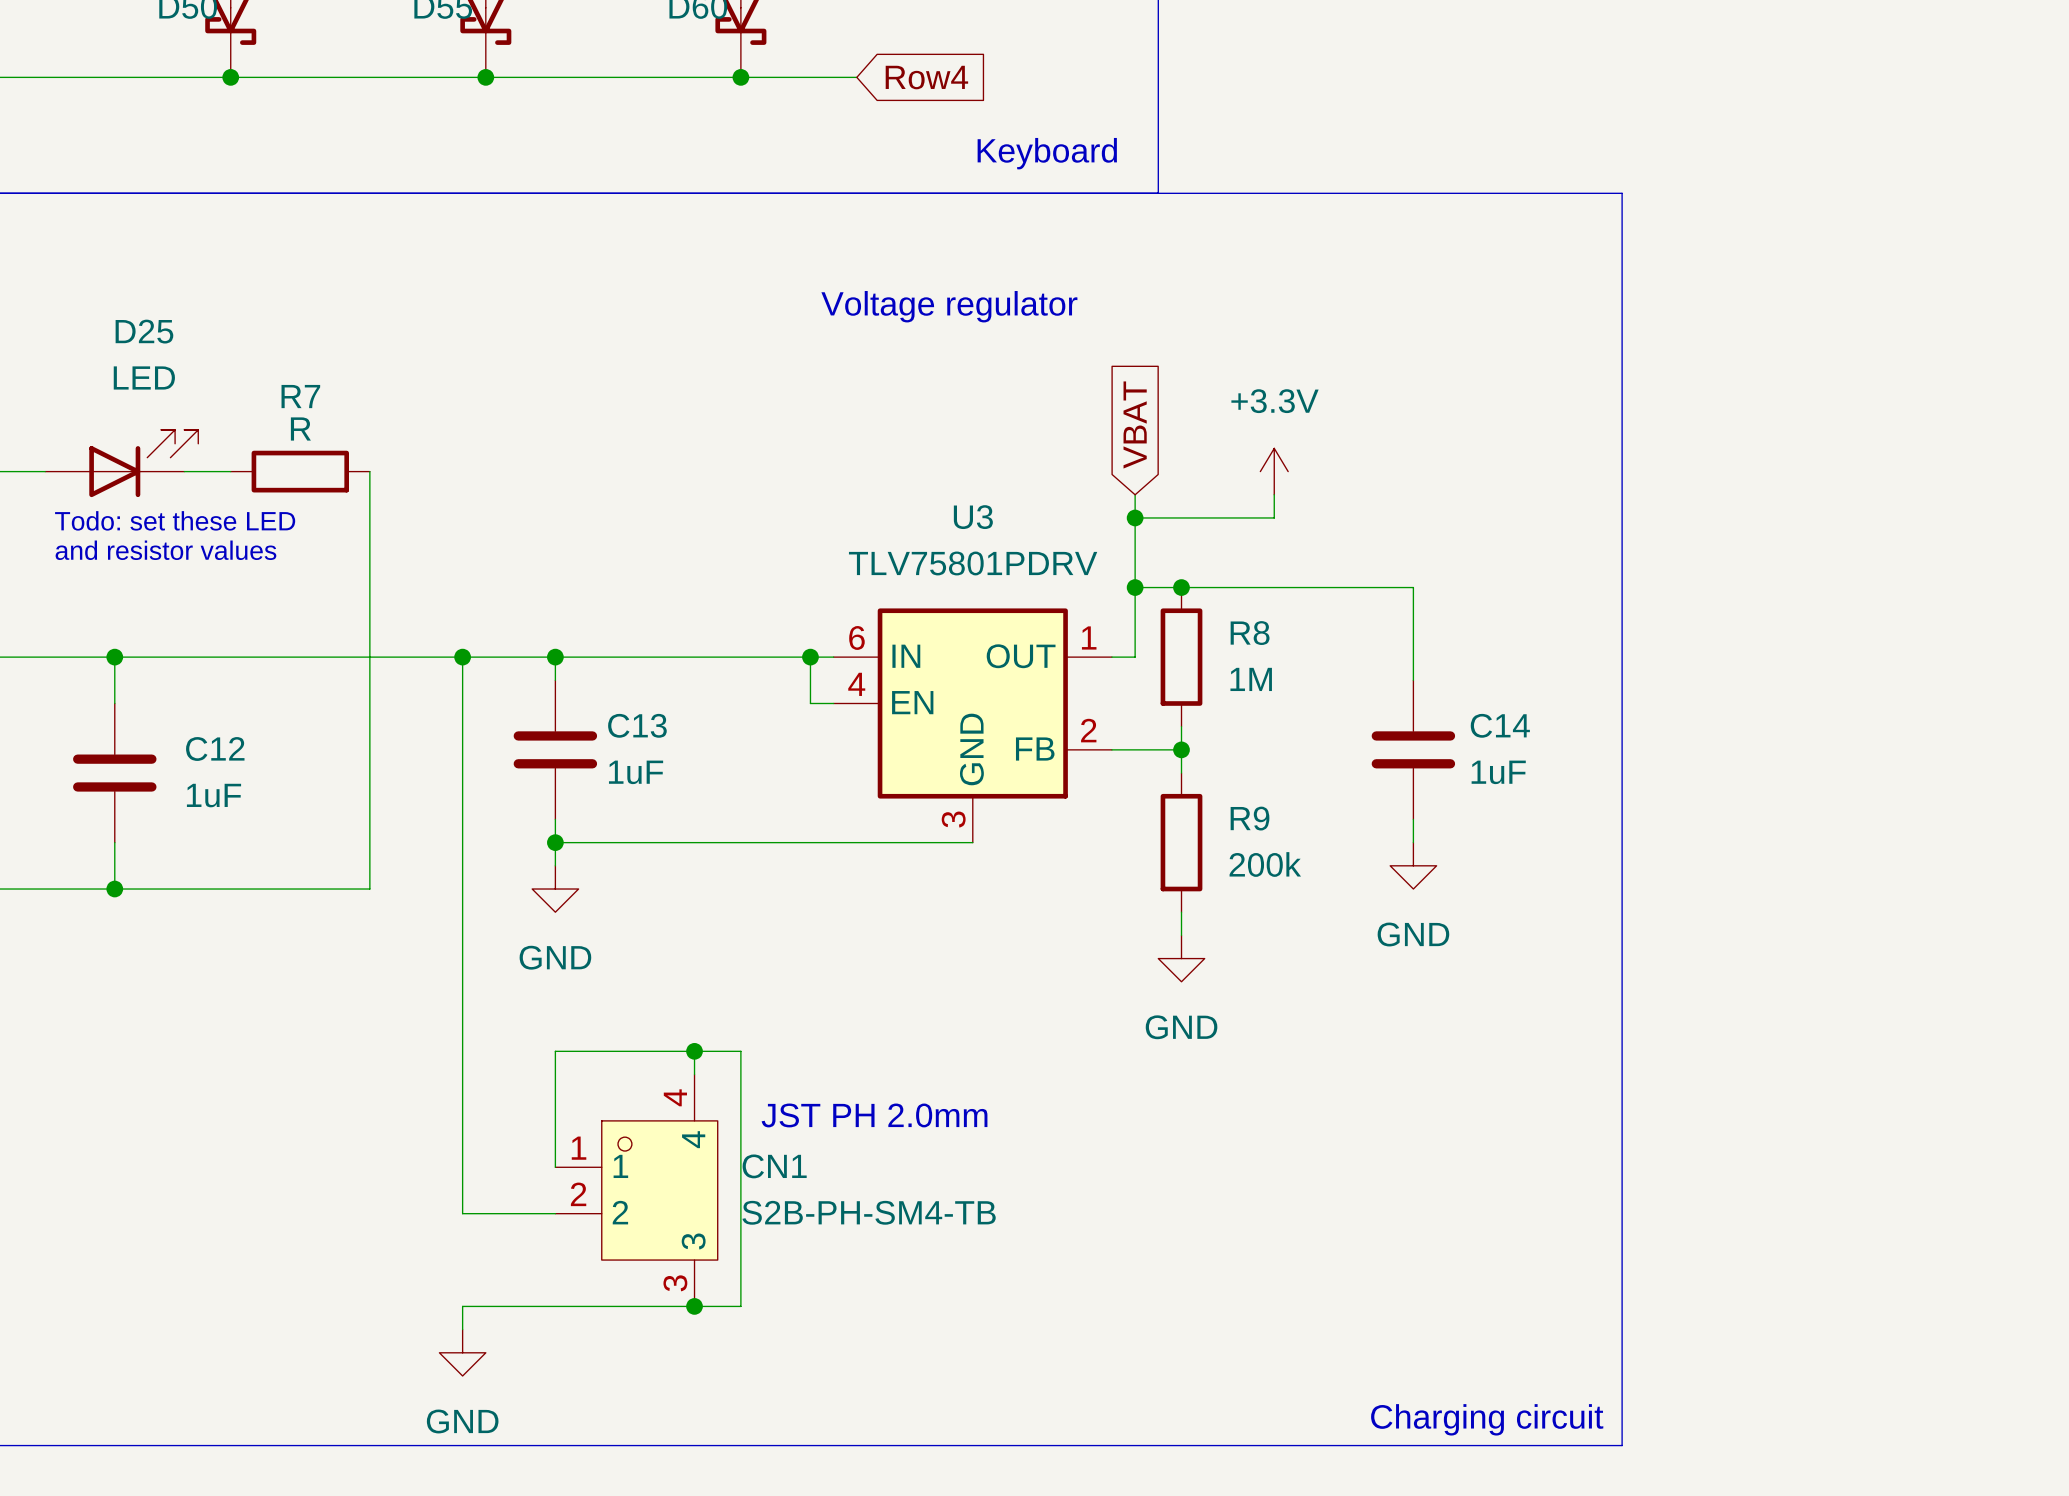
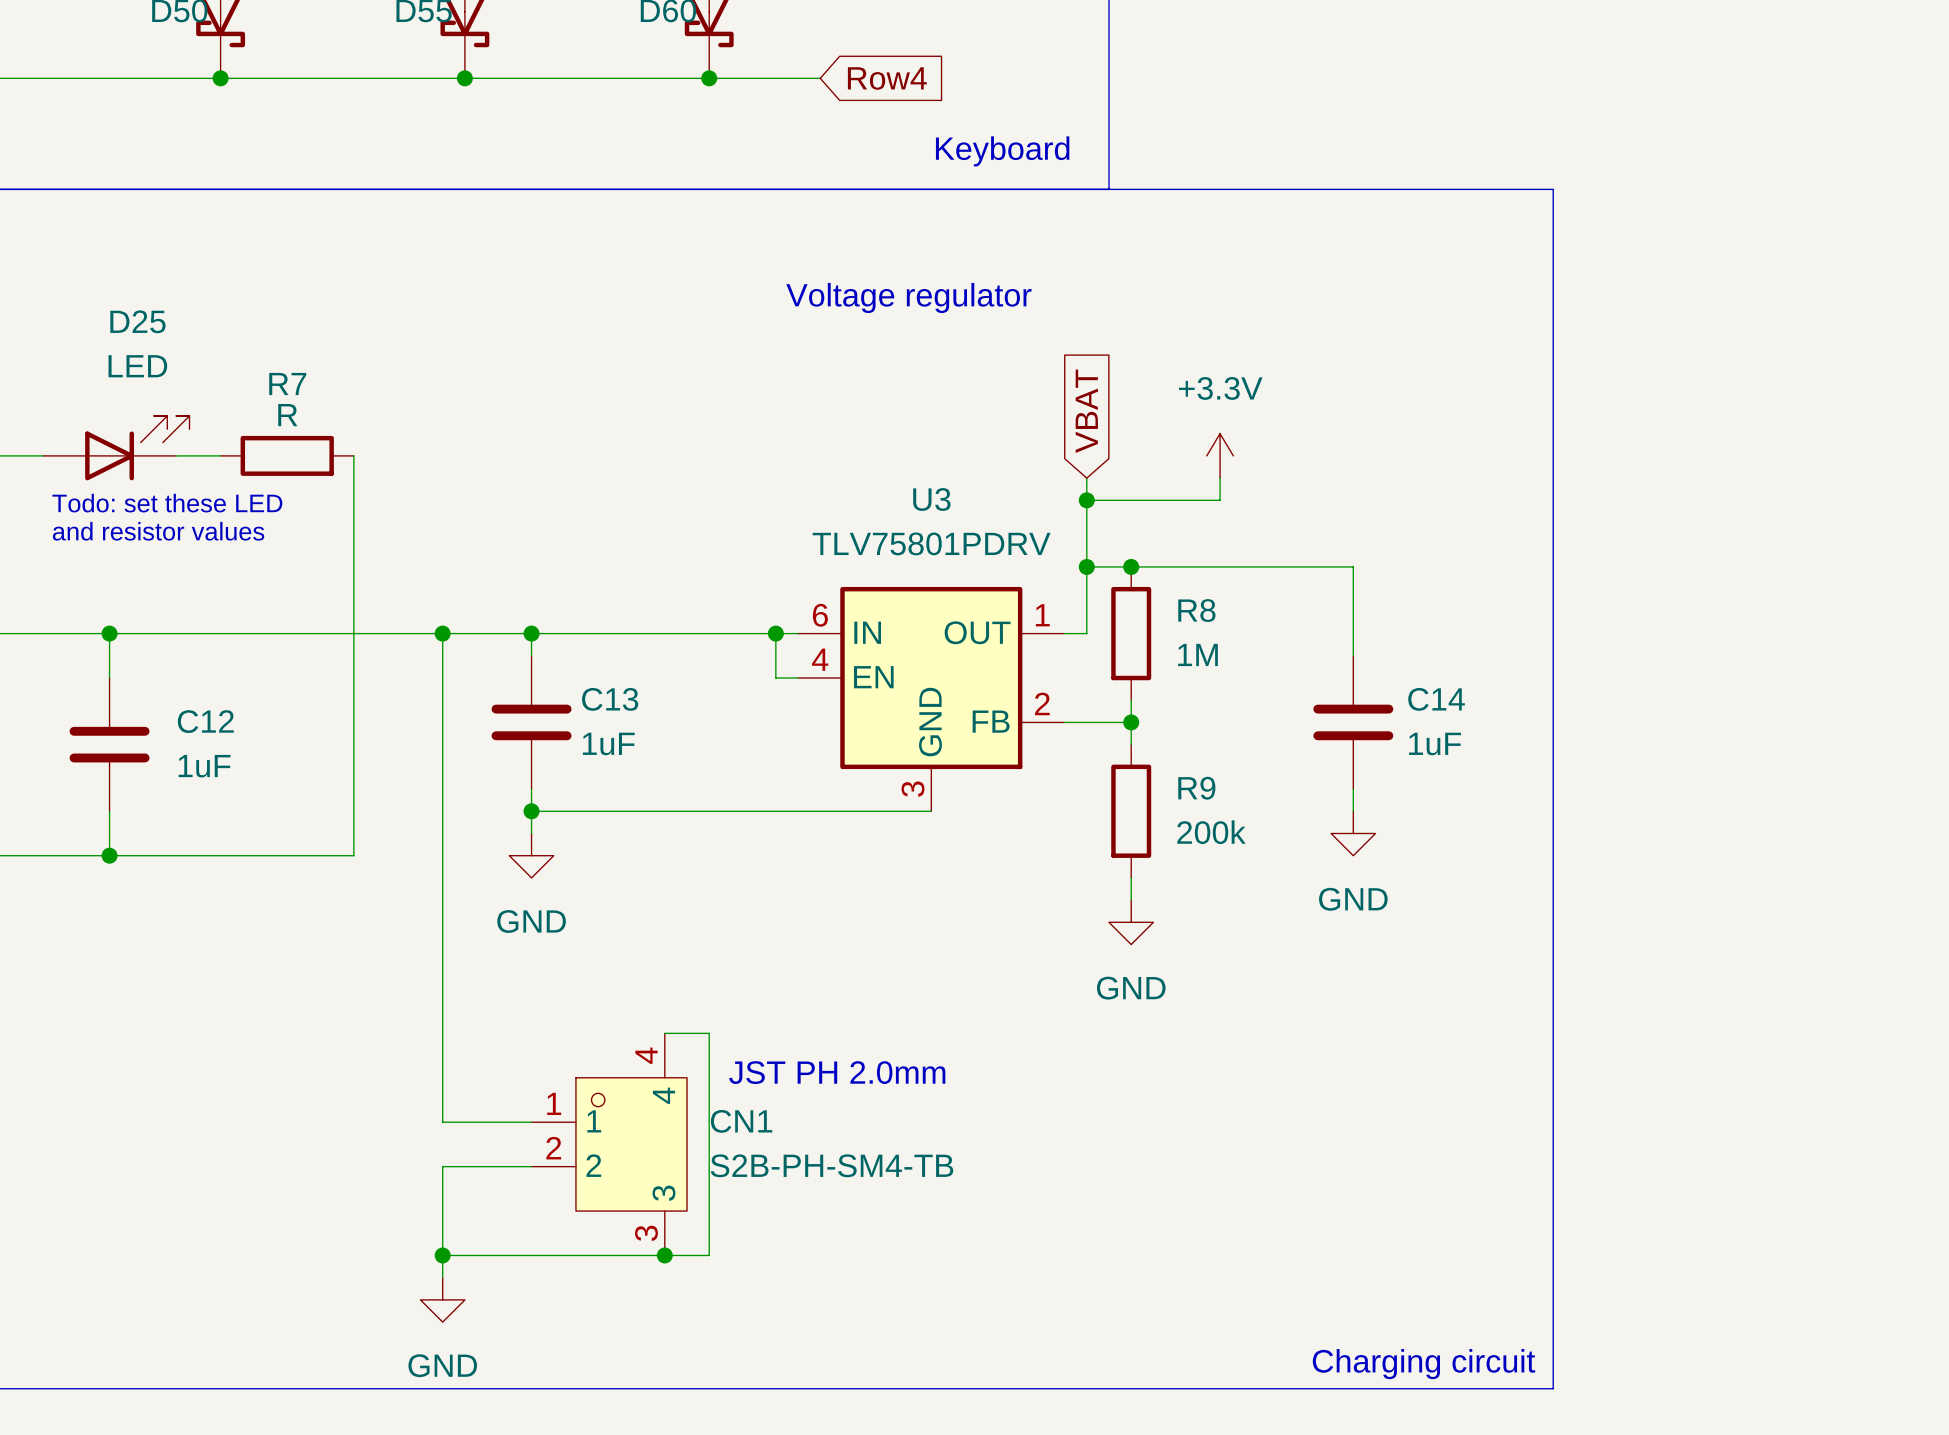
wire: (694, 1051) (694, 1074) -> (709, 1033) (664, 1033)
junction: (694, 1051) -> none
wire: (740, 1074) (740, 1051) (555, 1051) (555, 1167) -> none
wire: (462, 1167) (462, 1213) -> (442, 1122) (531, 1122)
wire: none -> (442, 1166) (442, 1255)
junction: none -> (442, 1255)

